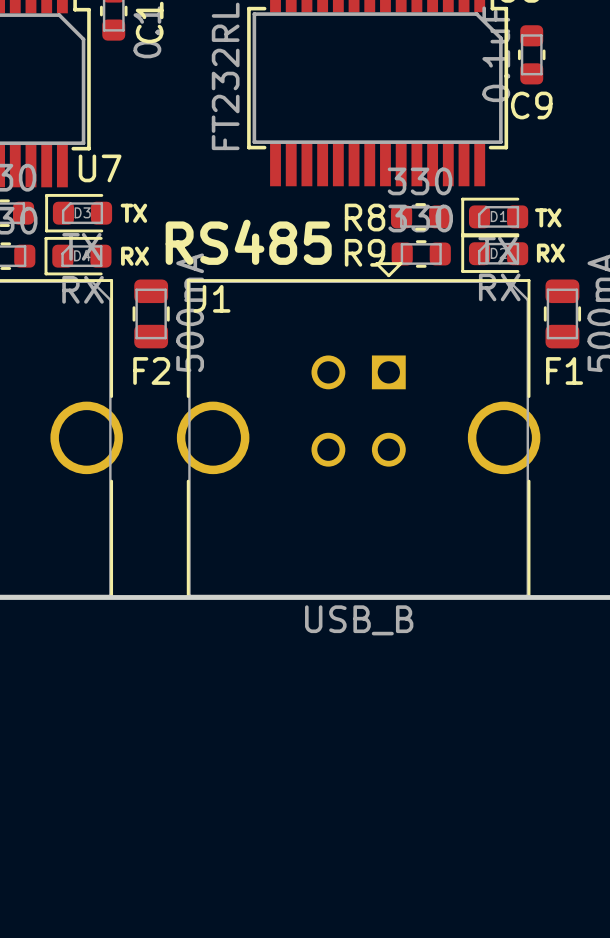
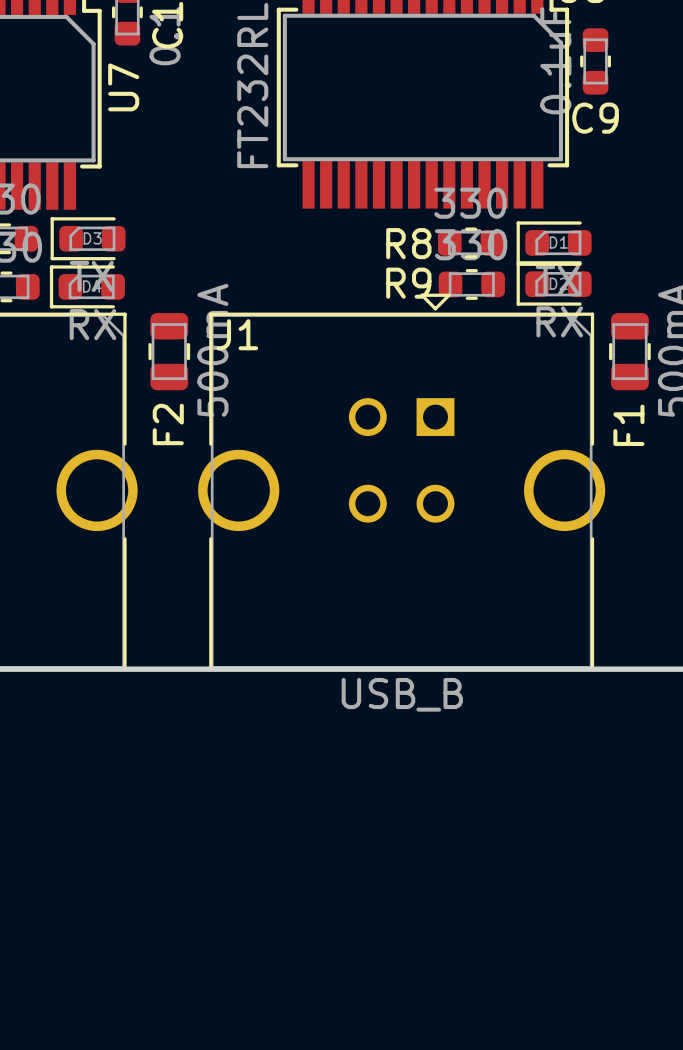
U7 name rotation: 0° (100, 168) -> 90° counterclockwise (123, 87)
U7 name position: U7 (100, 168) -> U7 (123, 87)
text: TX (133, 213) -> none
text: TX (548, 217) -> none
text: RS485 (248, 242) -> none
text: RX (550, 253) -> none
text: RX (134, 256) -> none
F2 name rotation: 0° (151, 370) -> 90° counterclockwise (168, 424)
F1 name rotation: 0° (564, 370) -> 90° counterclockwise (628, 425)

